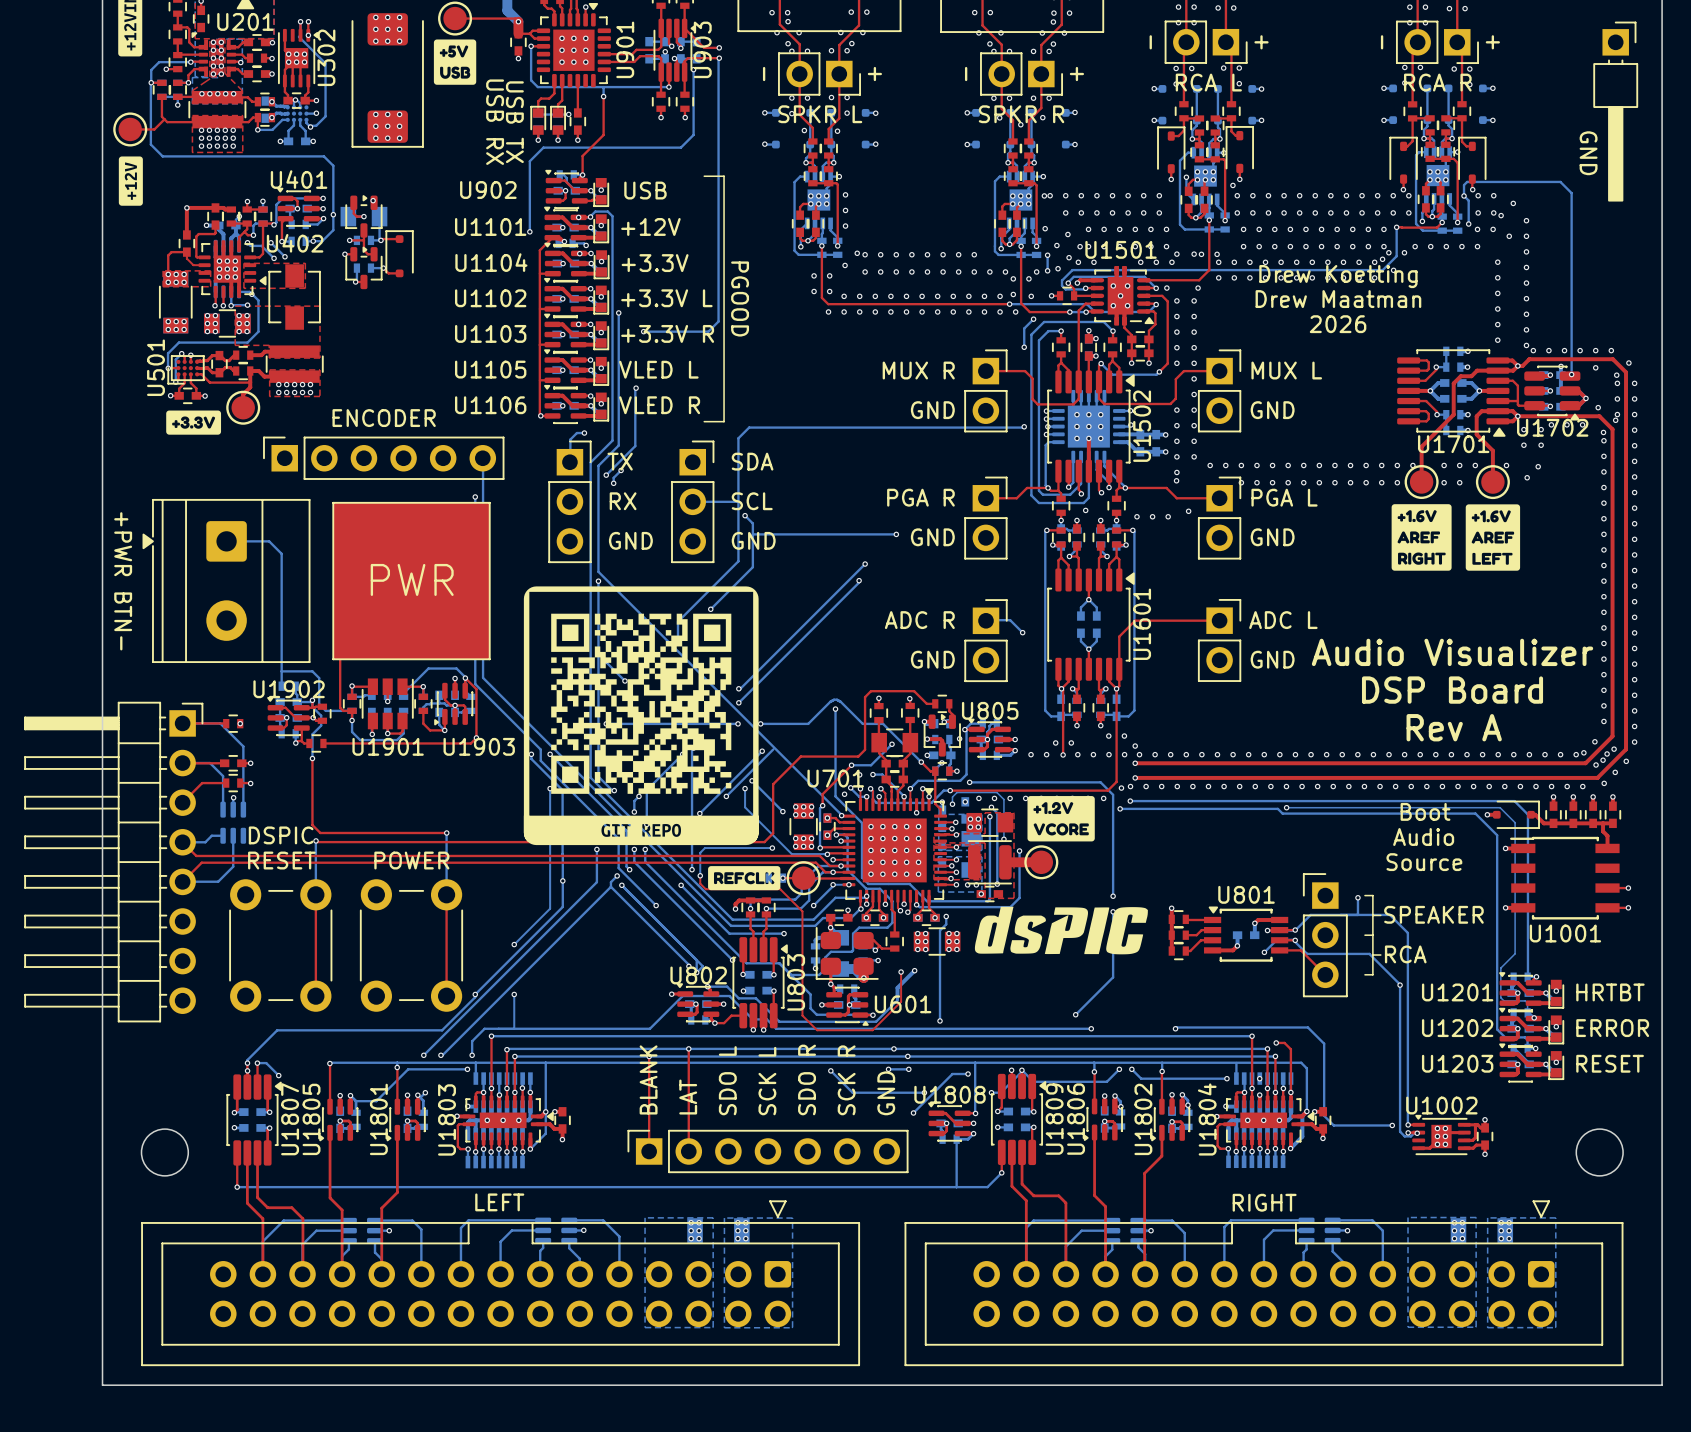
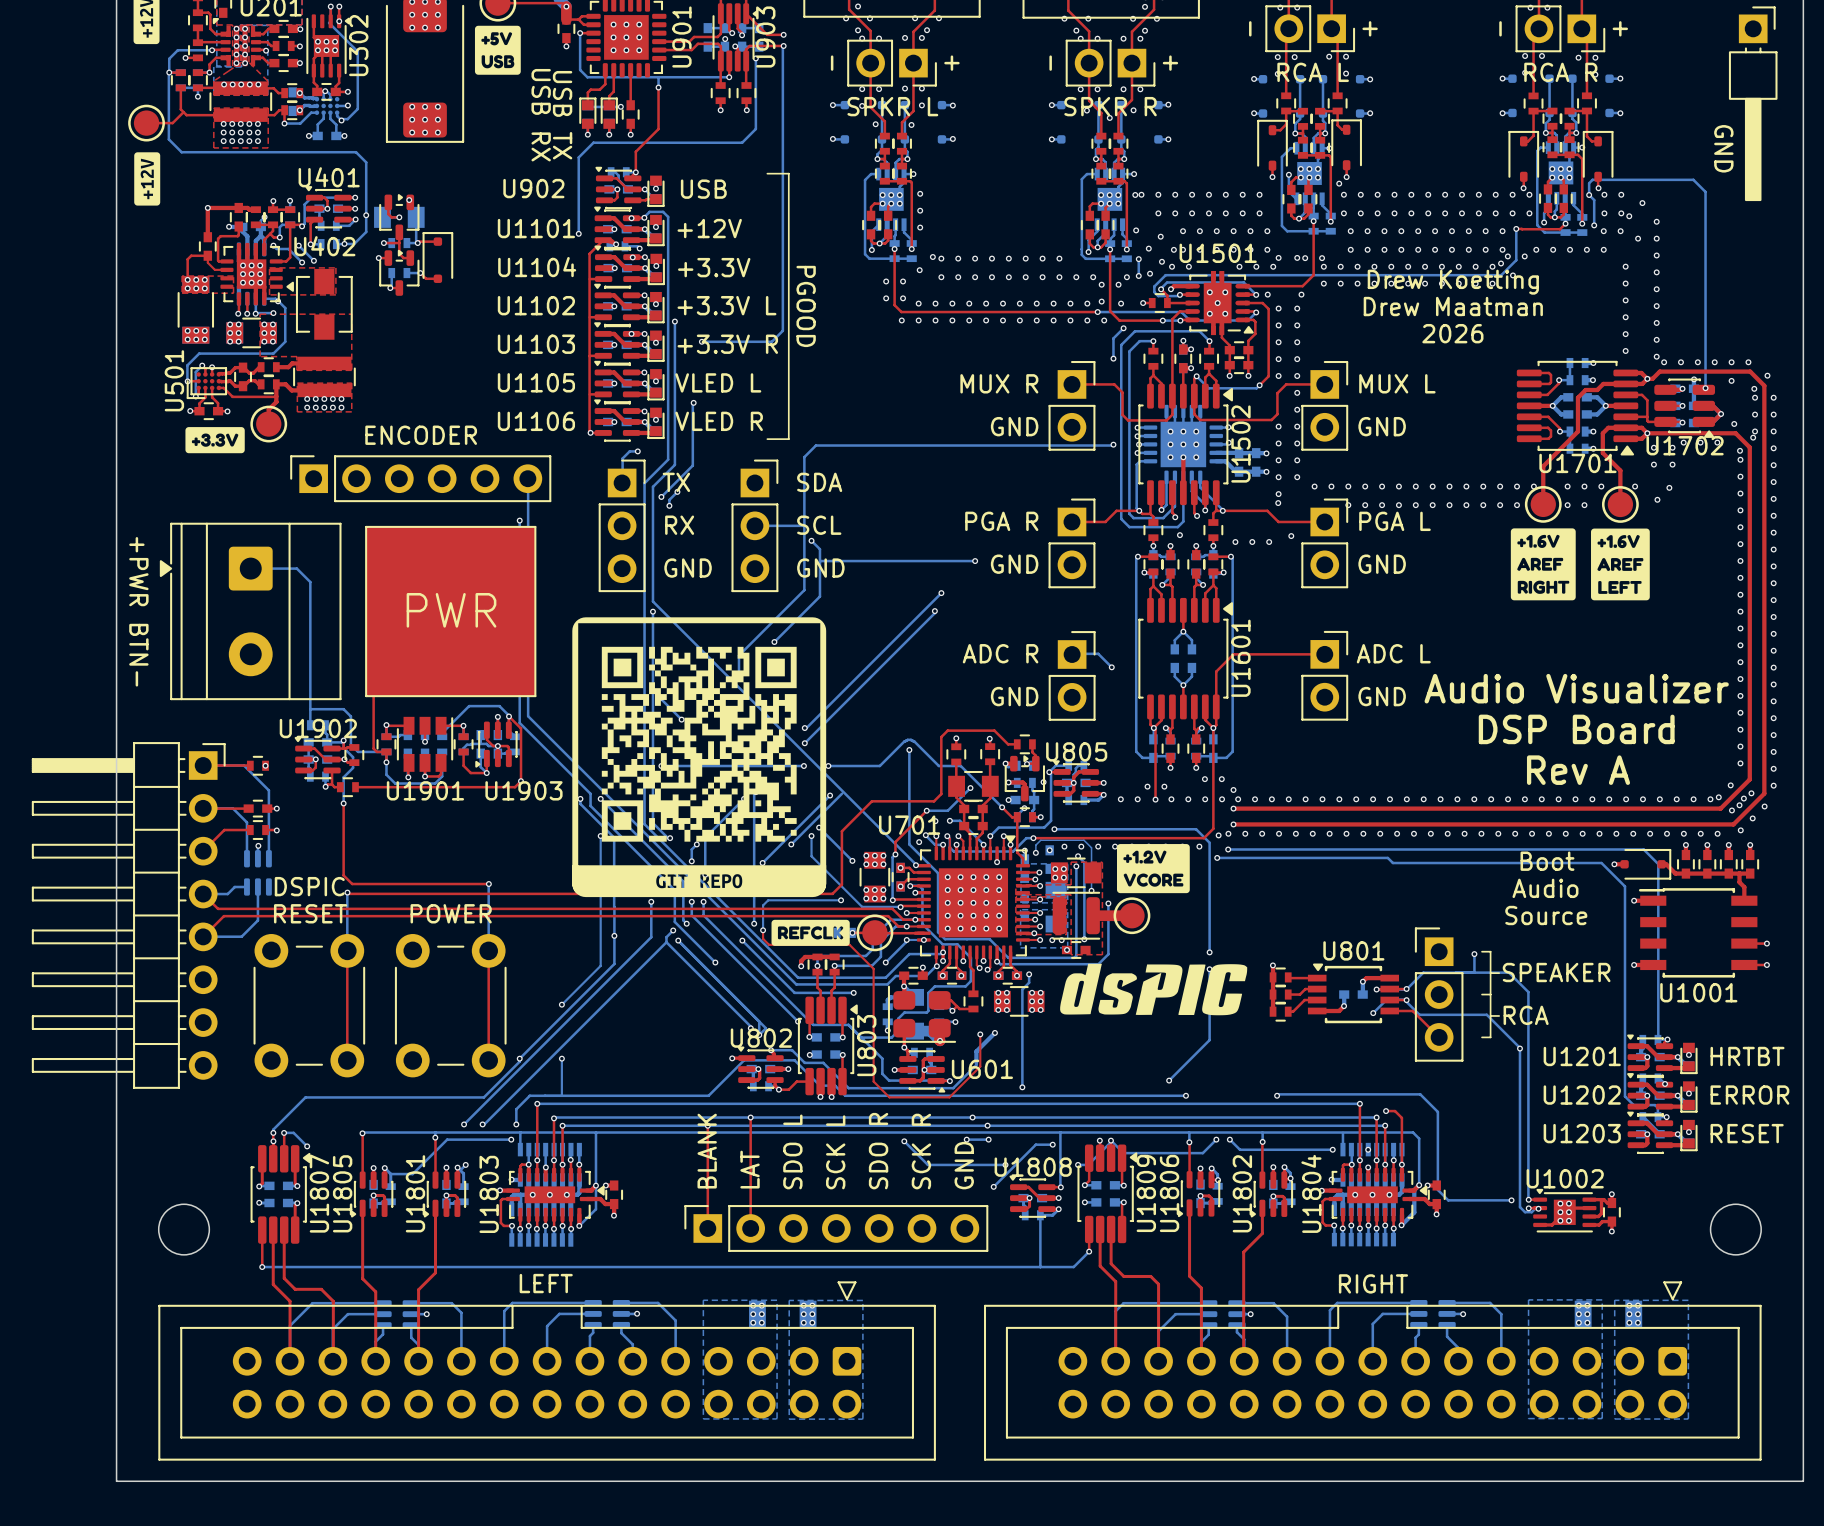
bottom track: (1286, 807) (1500, 807) (1515, 822) (1515, 953) (1500, 968) (1500, 997) (1504, 1000) (1525, 1000) (1527, 1003) (1527, 1012) -> none
via: (1286, 807) -> none

